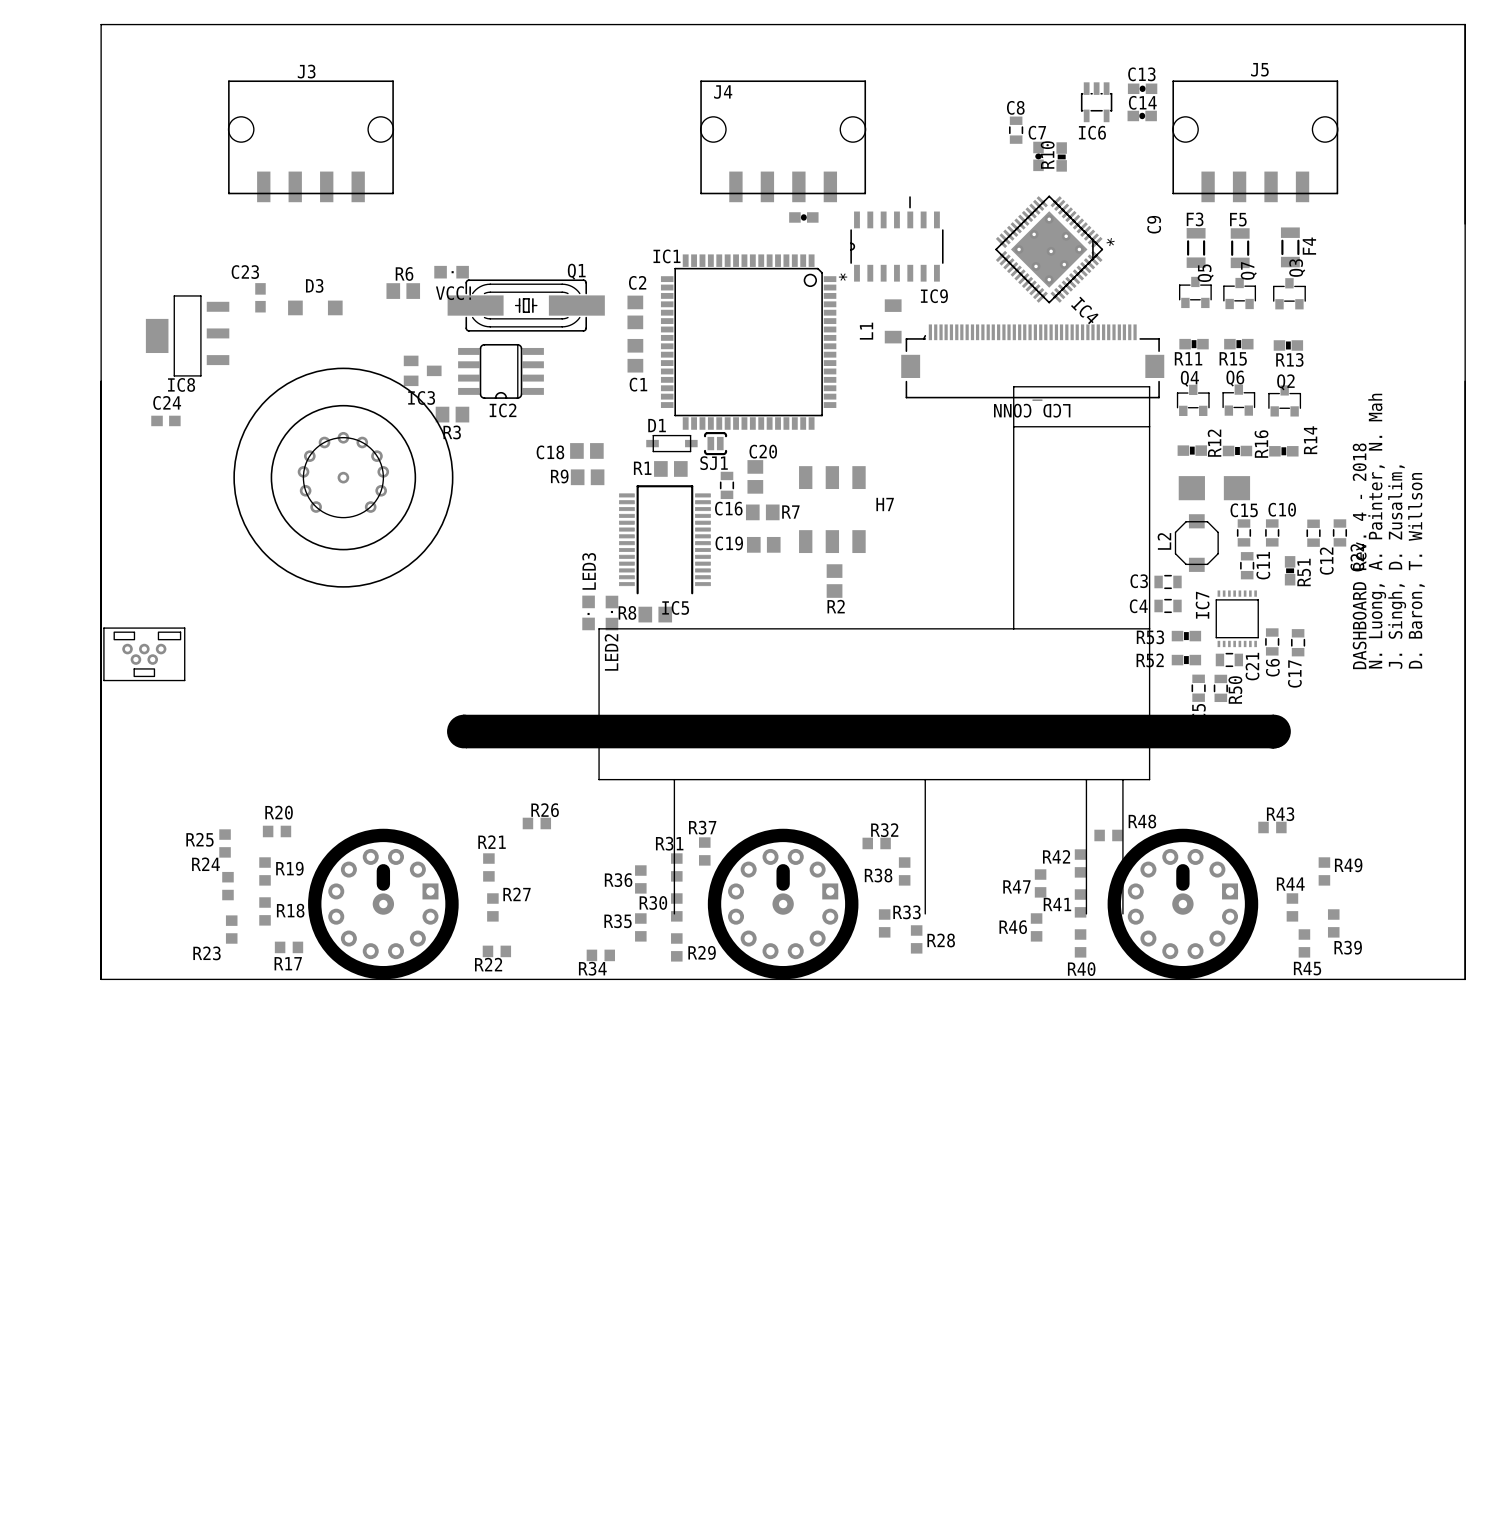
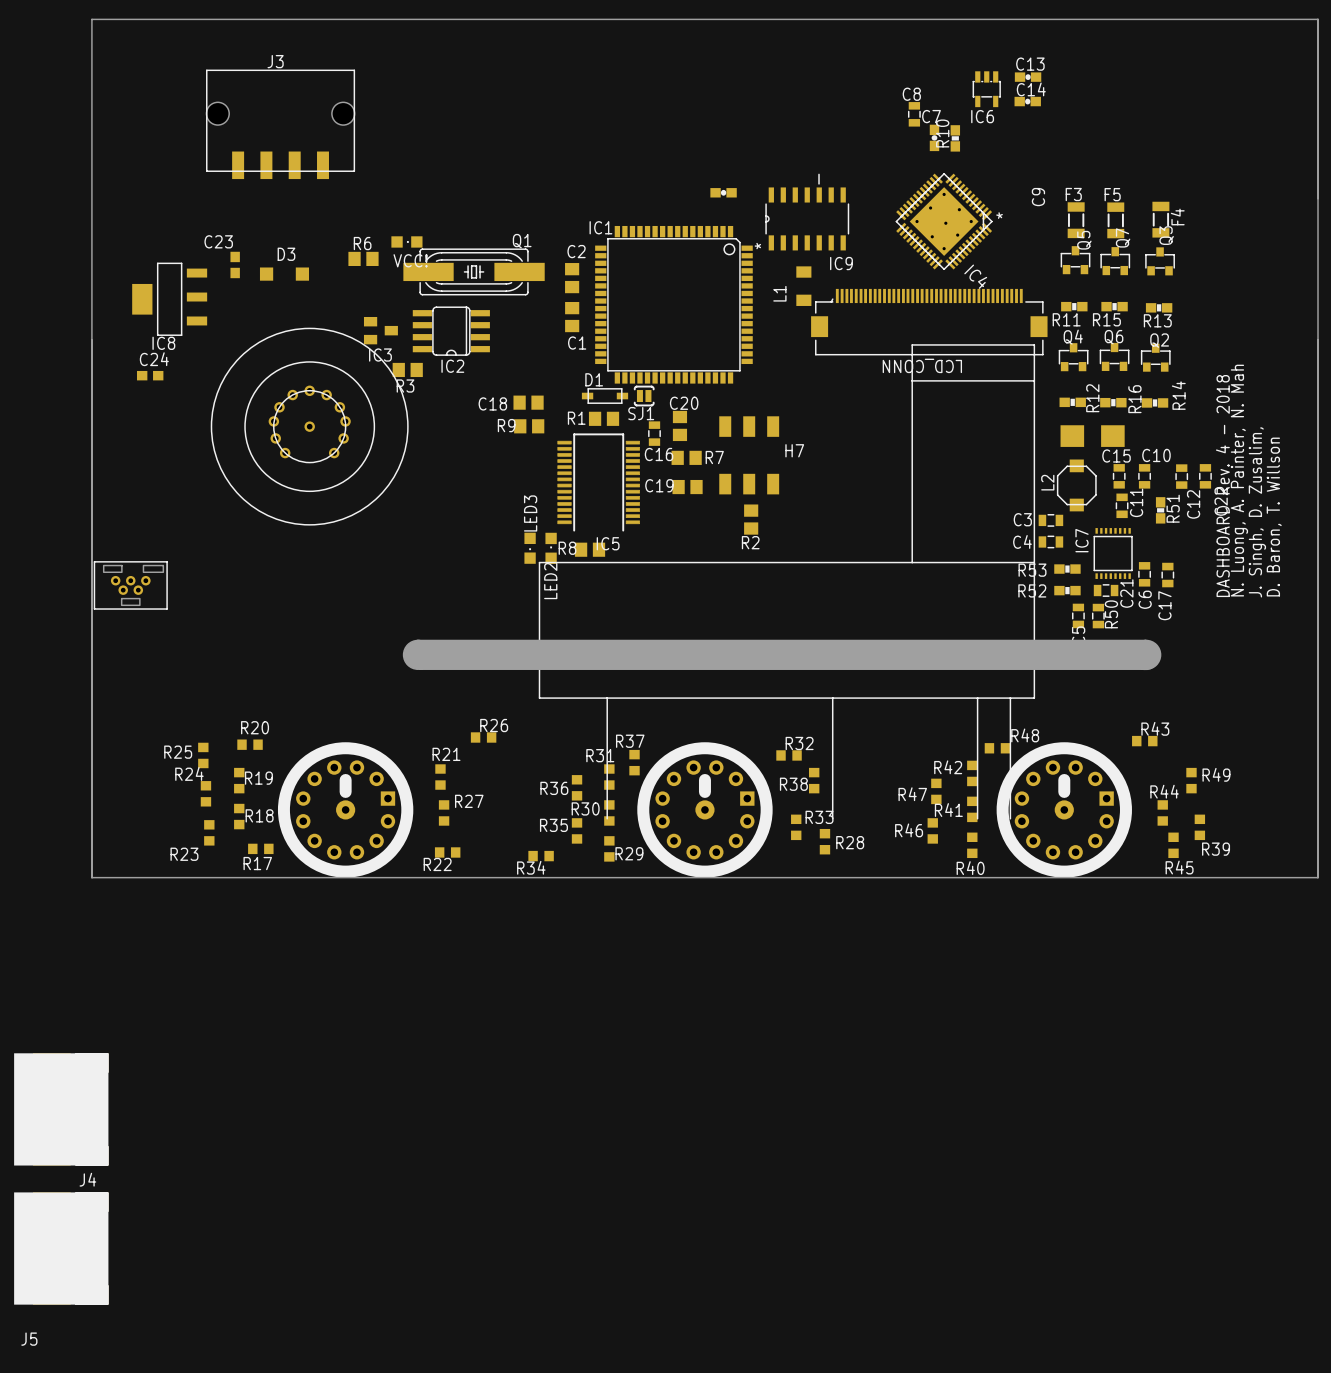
J5 name position: J5 (1259, 69) -> J5 (29, 1339)
J4 footprint: [700, 80, 867, 203] -> [14, 1053, 109, 1166]
J5 footprint: [1172, 80, 1339, 203] -> [14, 1192, 109, 1305]
J4 name position: J4 (723, 92) -> J4 (87, 1179)

